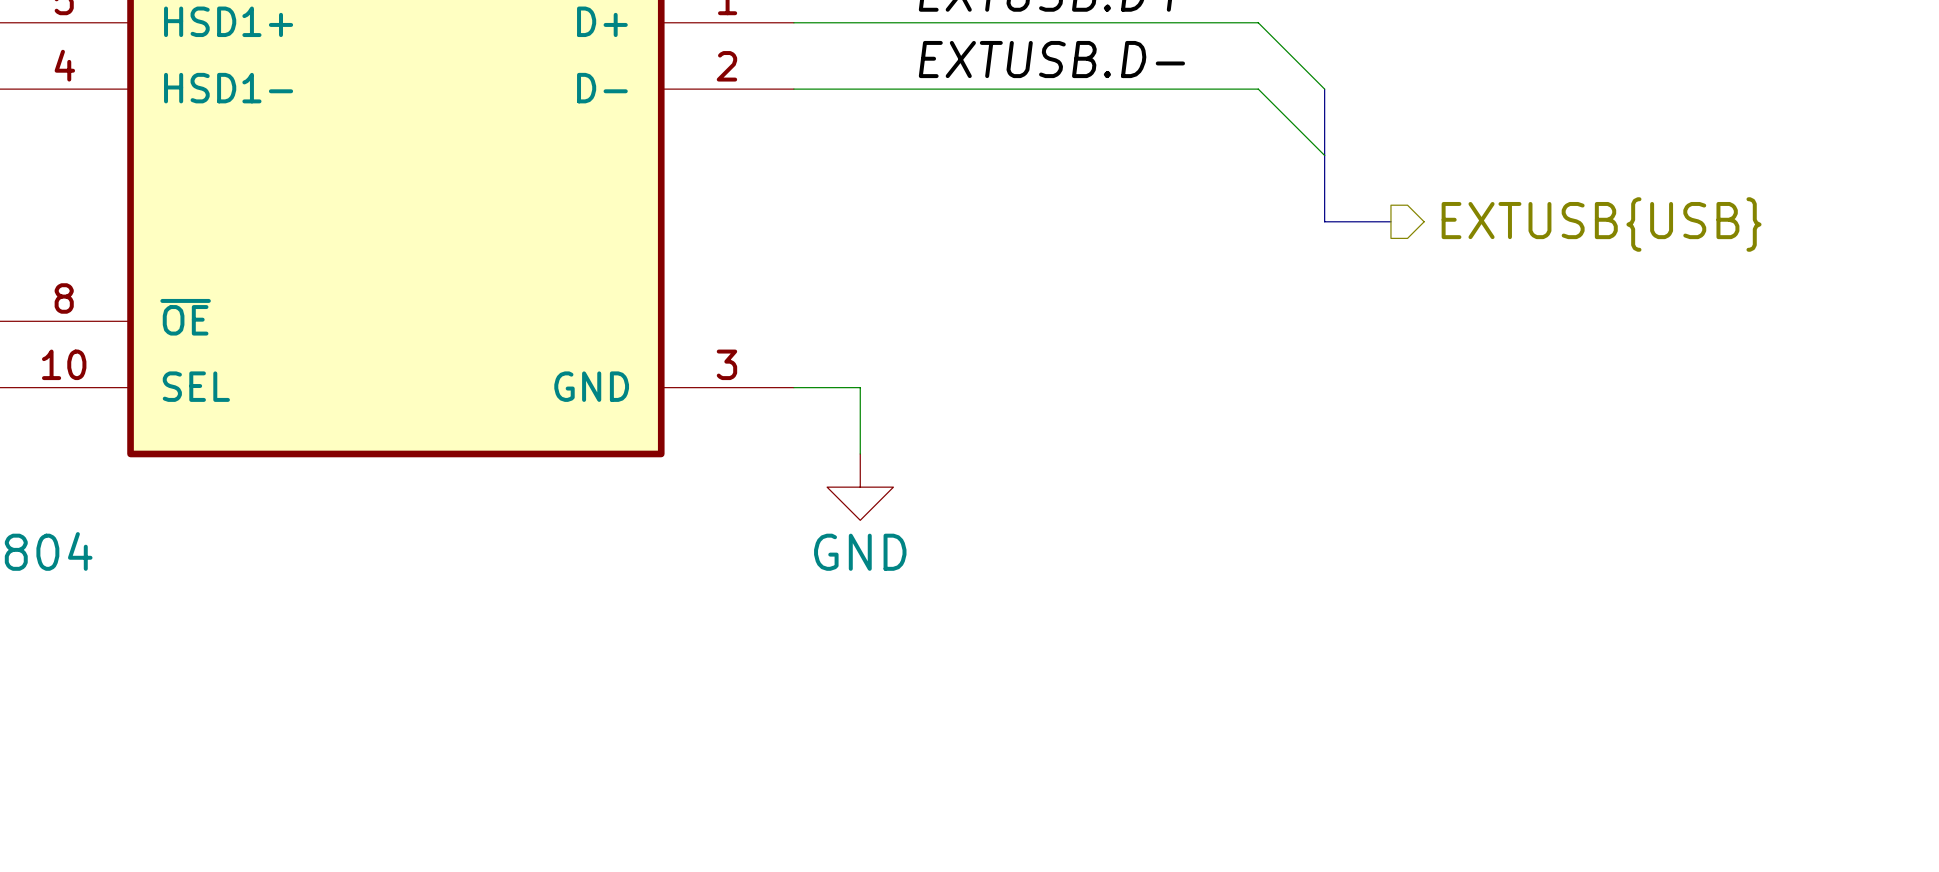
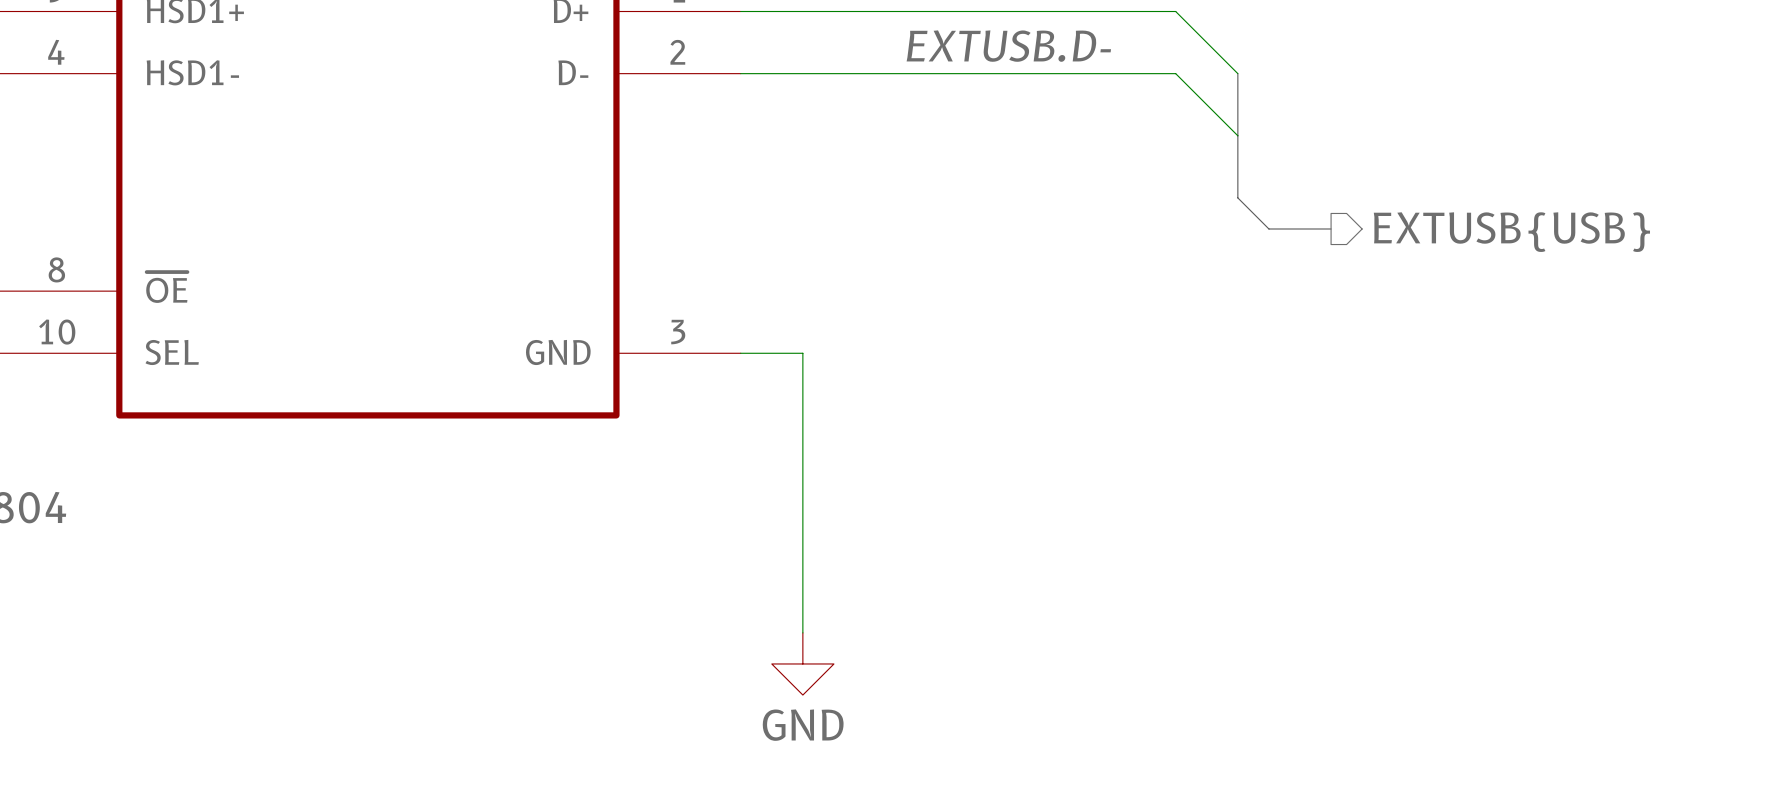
bus: (1324, 221) (1390, 221) -> (1237, 197) (1268, 228) (1331, 228)
hierarchical label position: EXTUSB{USB} (1601, 224) -> EXTUSB{USB} (1511, 232)
wire: none -> (802, 415) (802, 632)
power symbol position: GND (860, 487) -> GND (802, 663)

